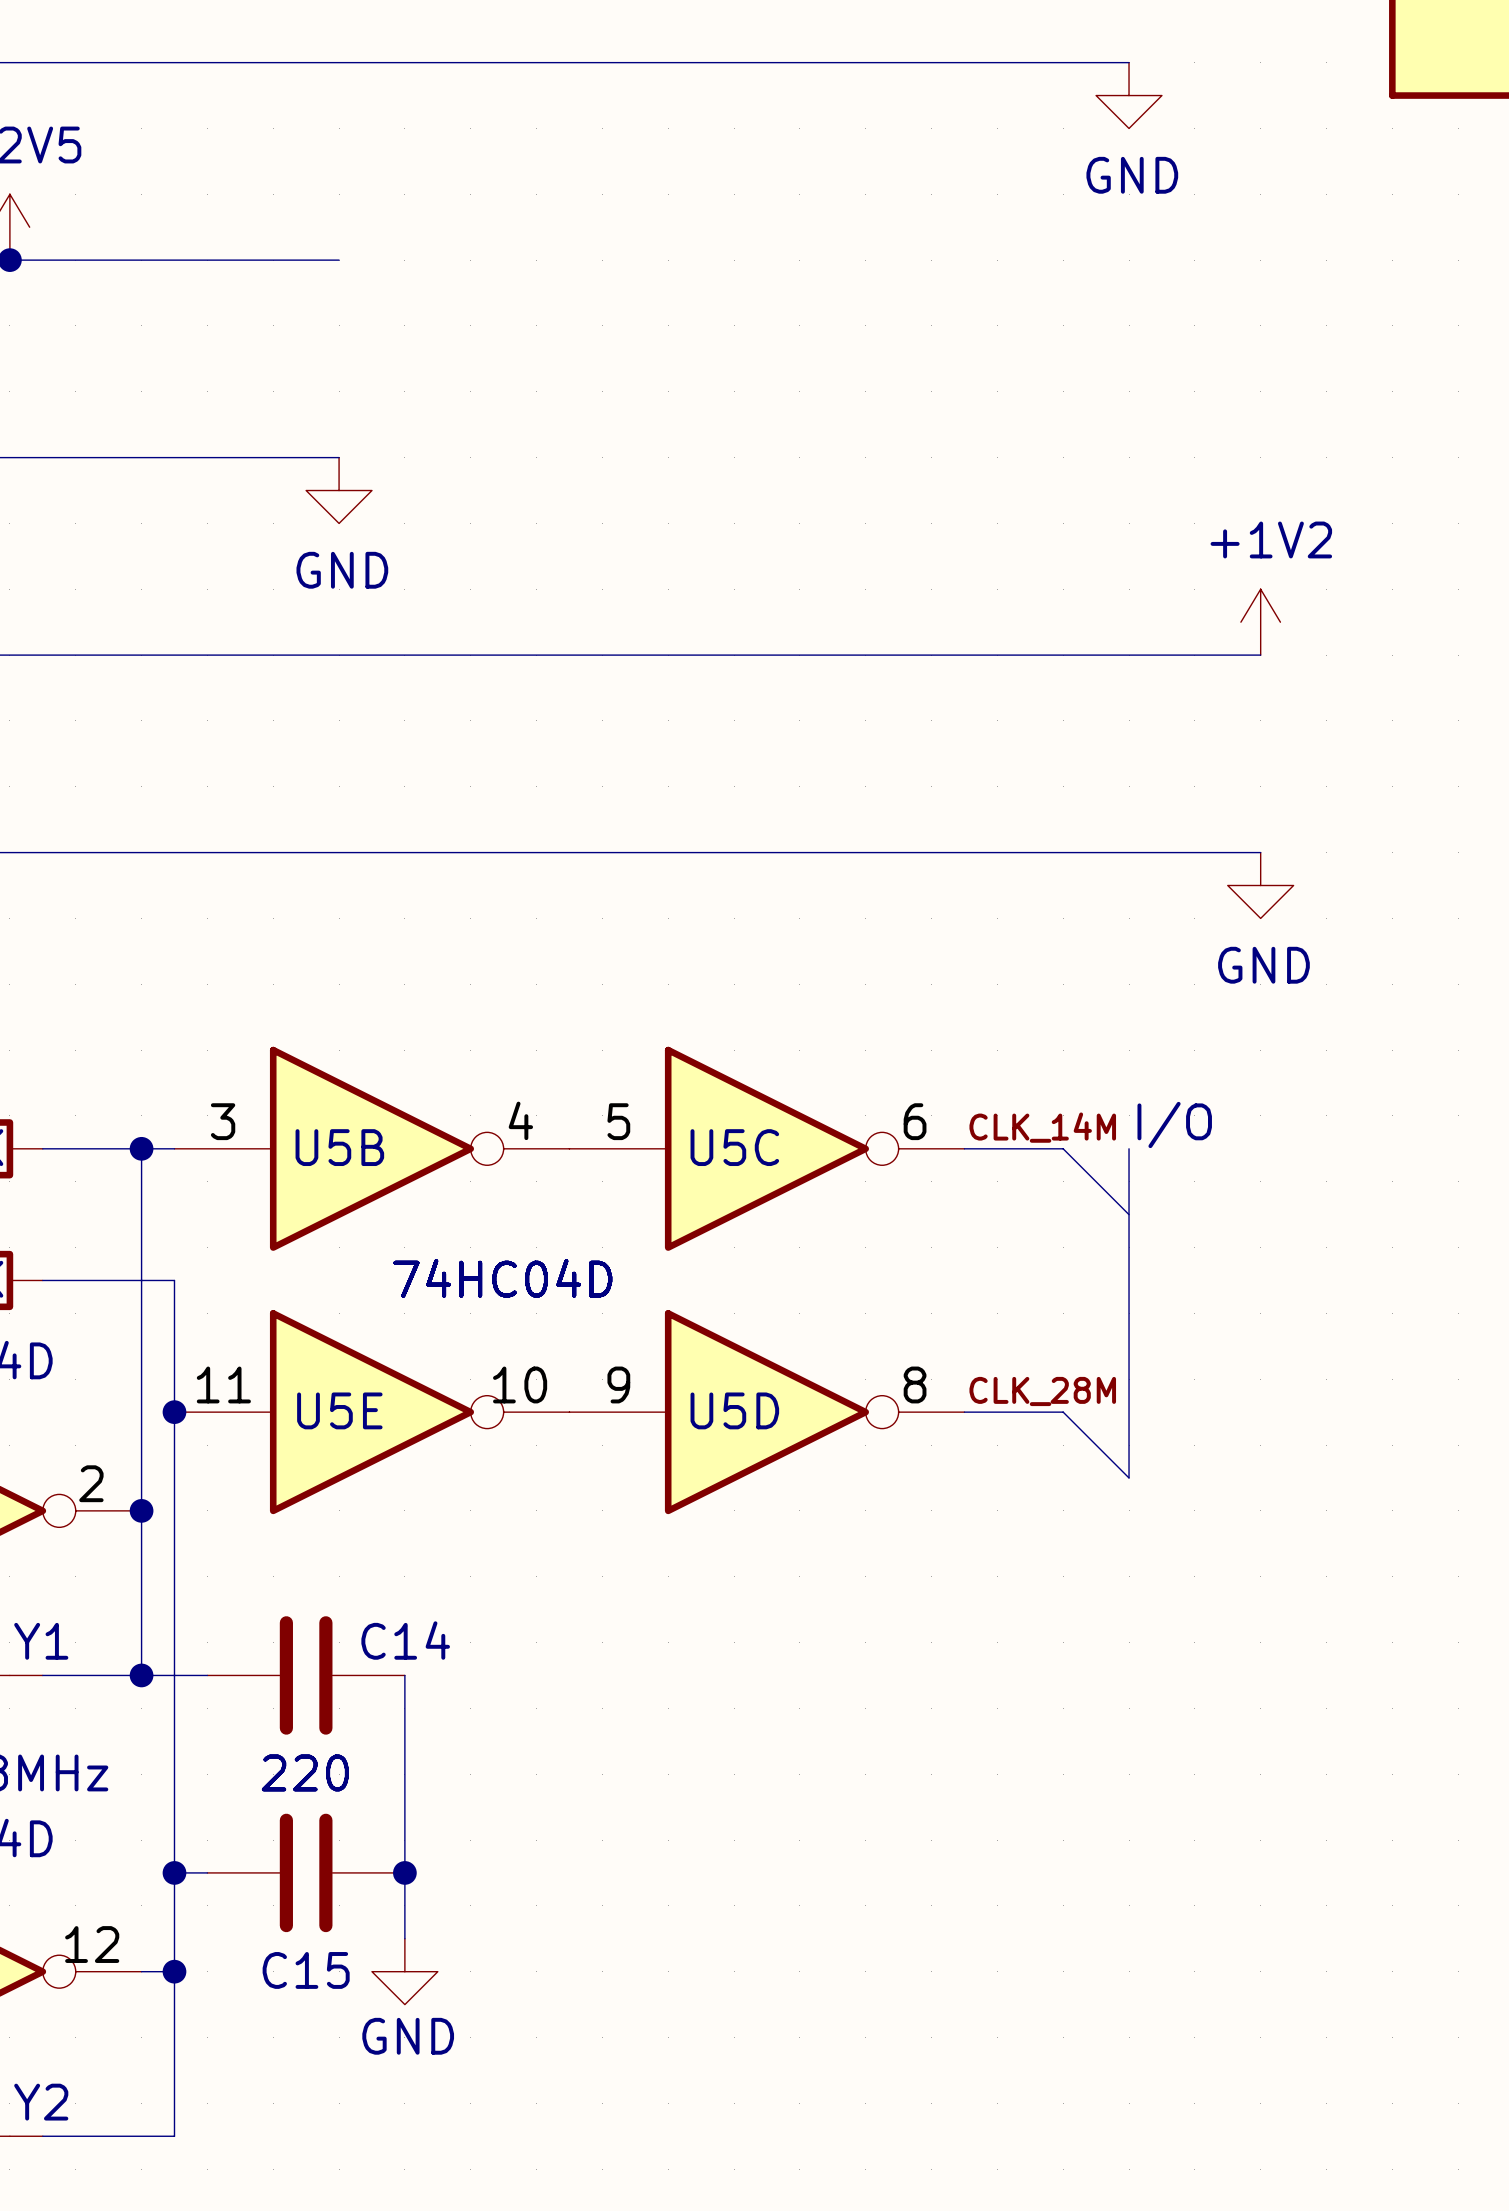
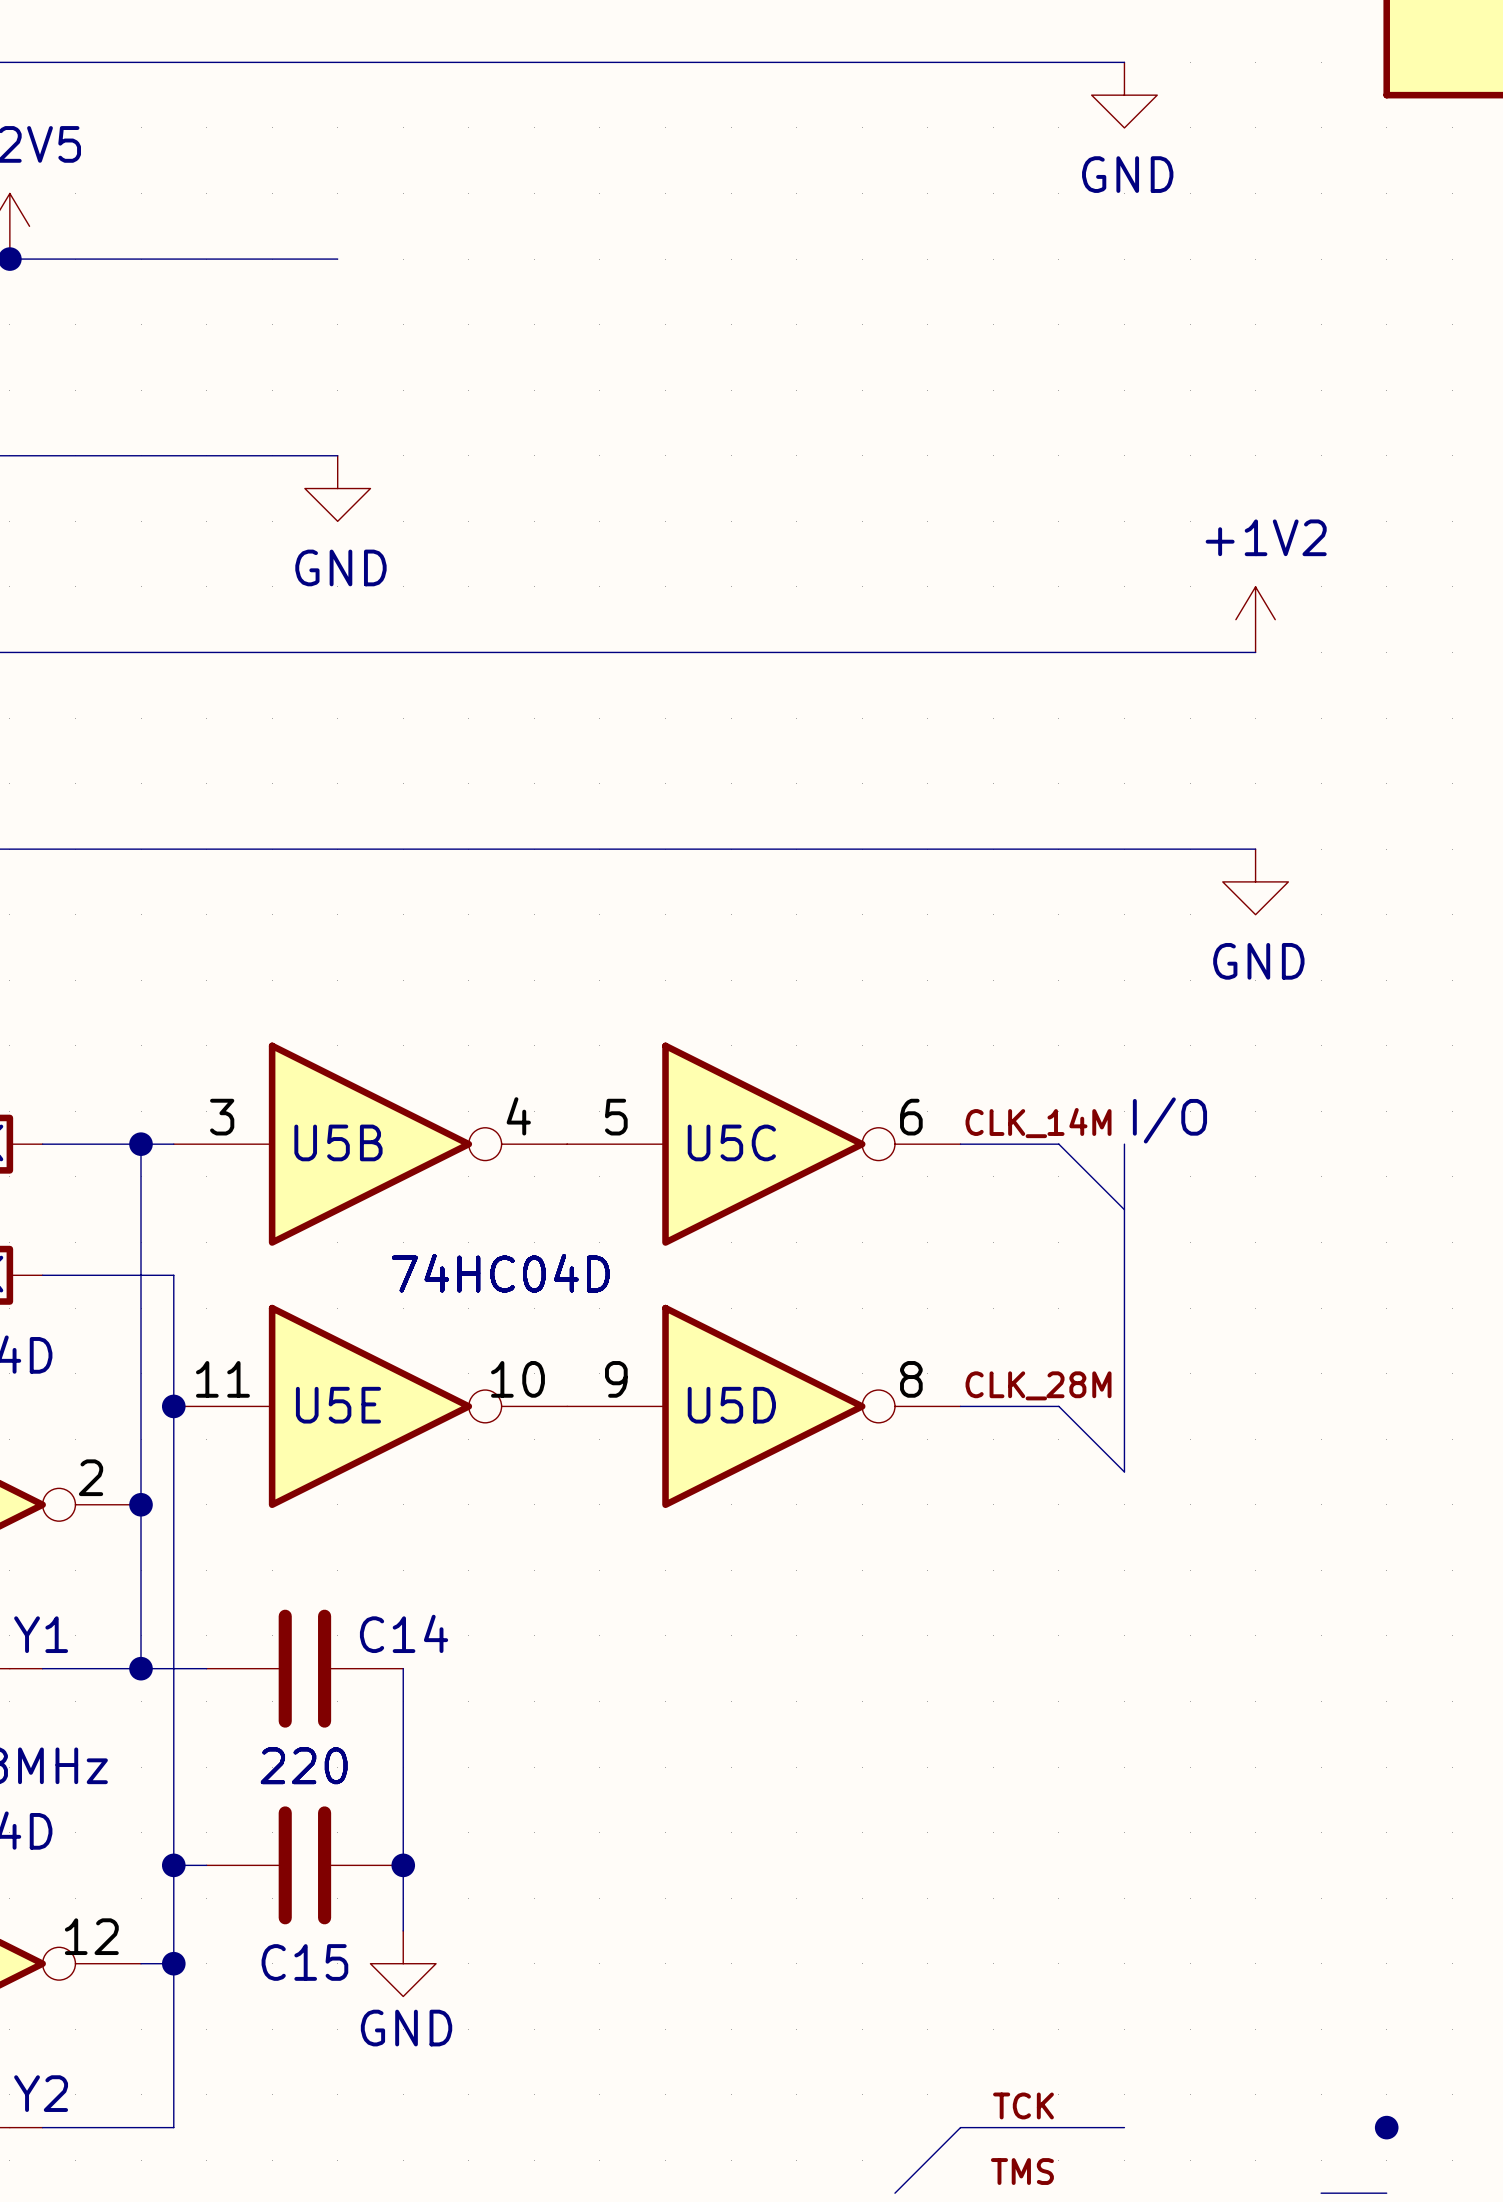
label: none -> TCK (1023, 2105)
wire: none -> (1124, 2127) (960, 2127) (894, 2193)
junction: none -> (1386, 2127)
label: none -> TMS (1022, 2171)
wire: none -> (1321, 2193) (1386, 2193)

